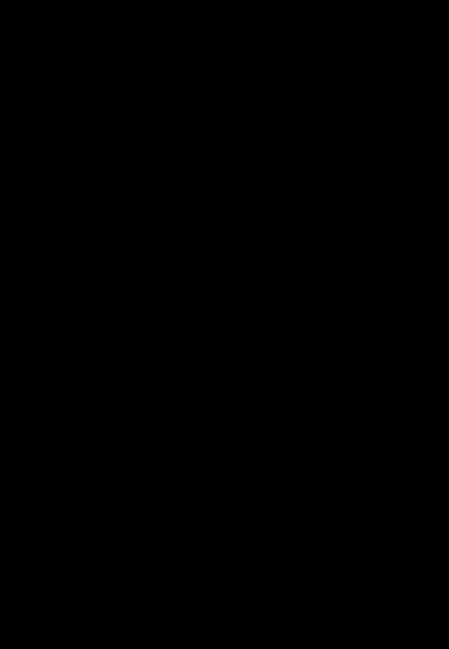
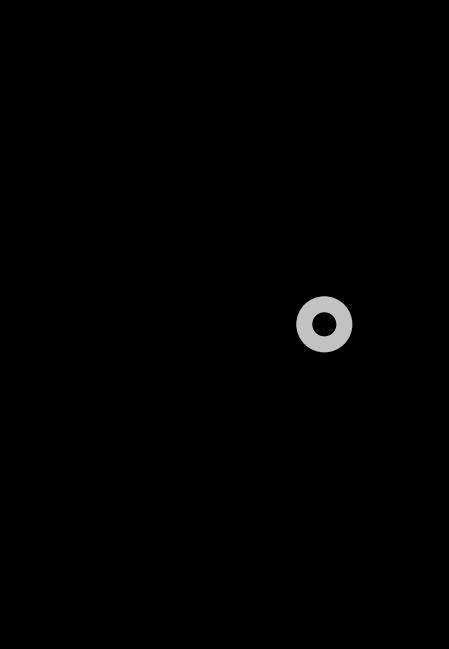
via: none -> (324, 324)

